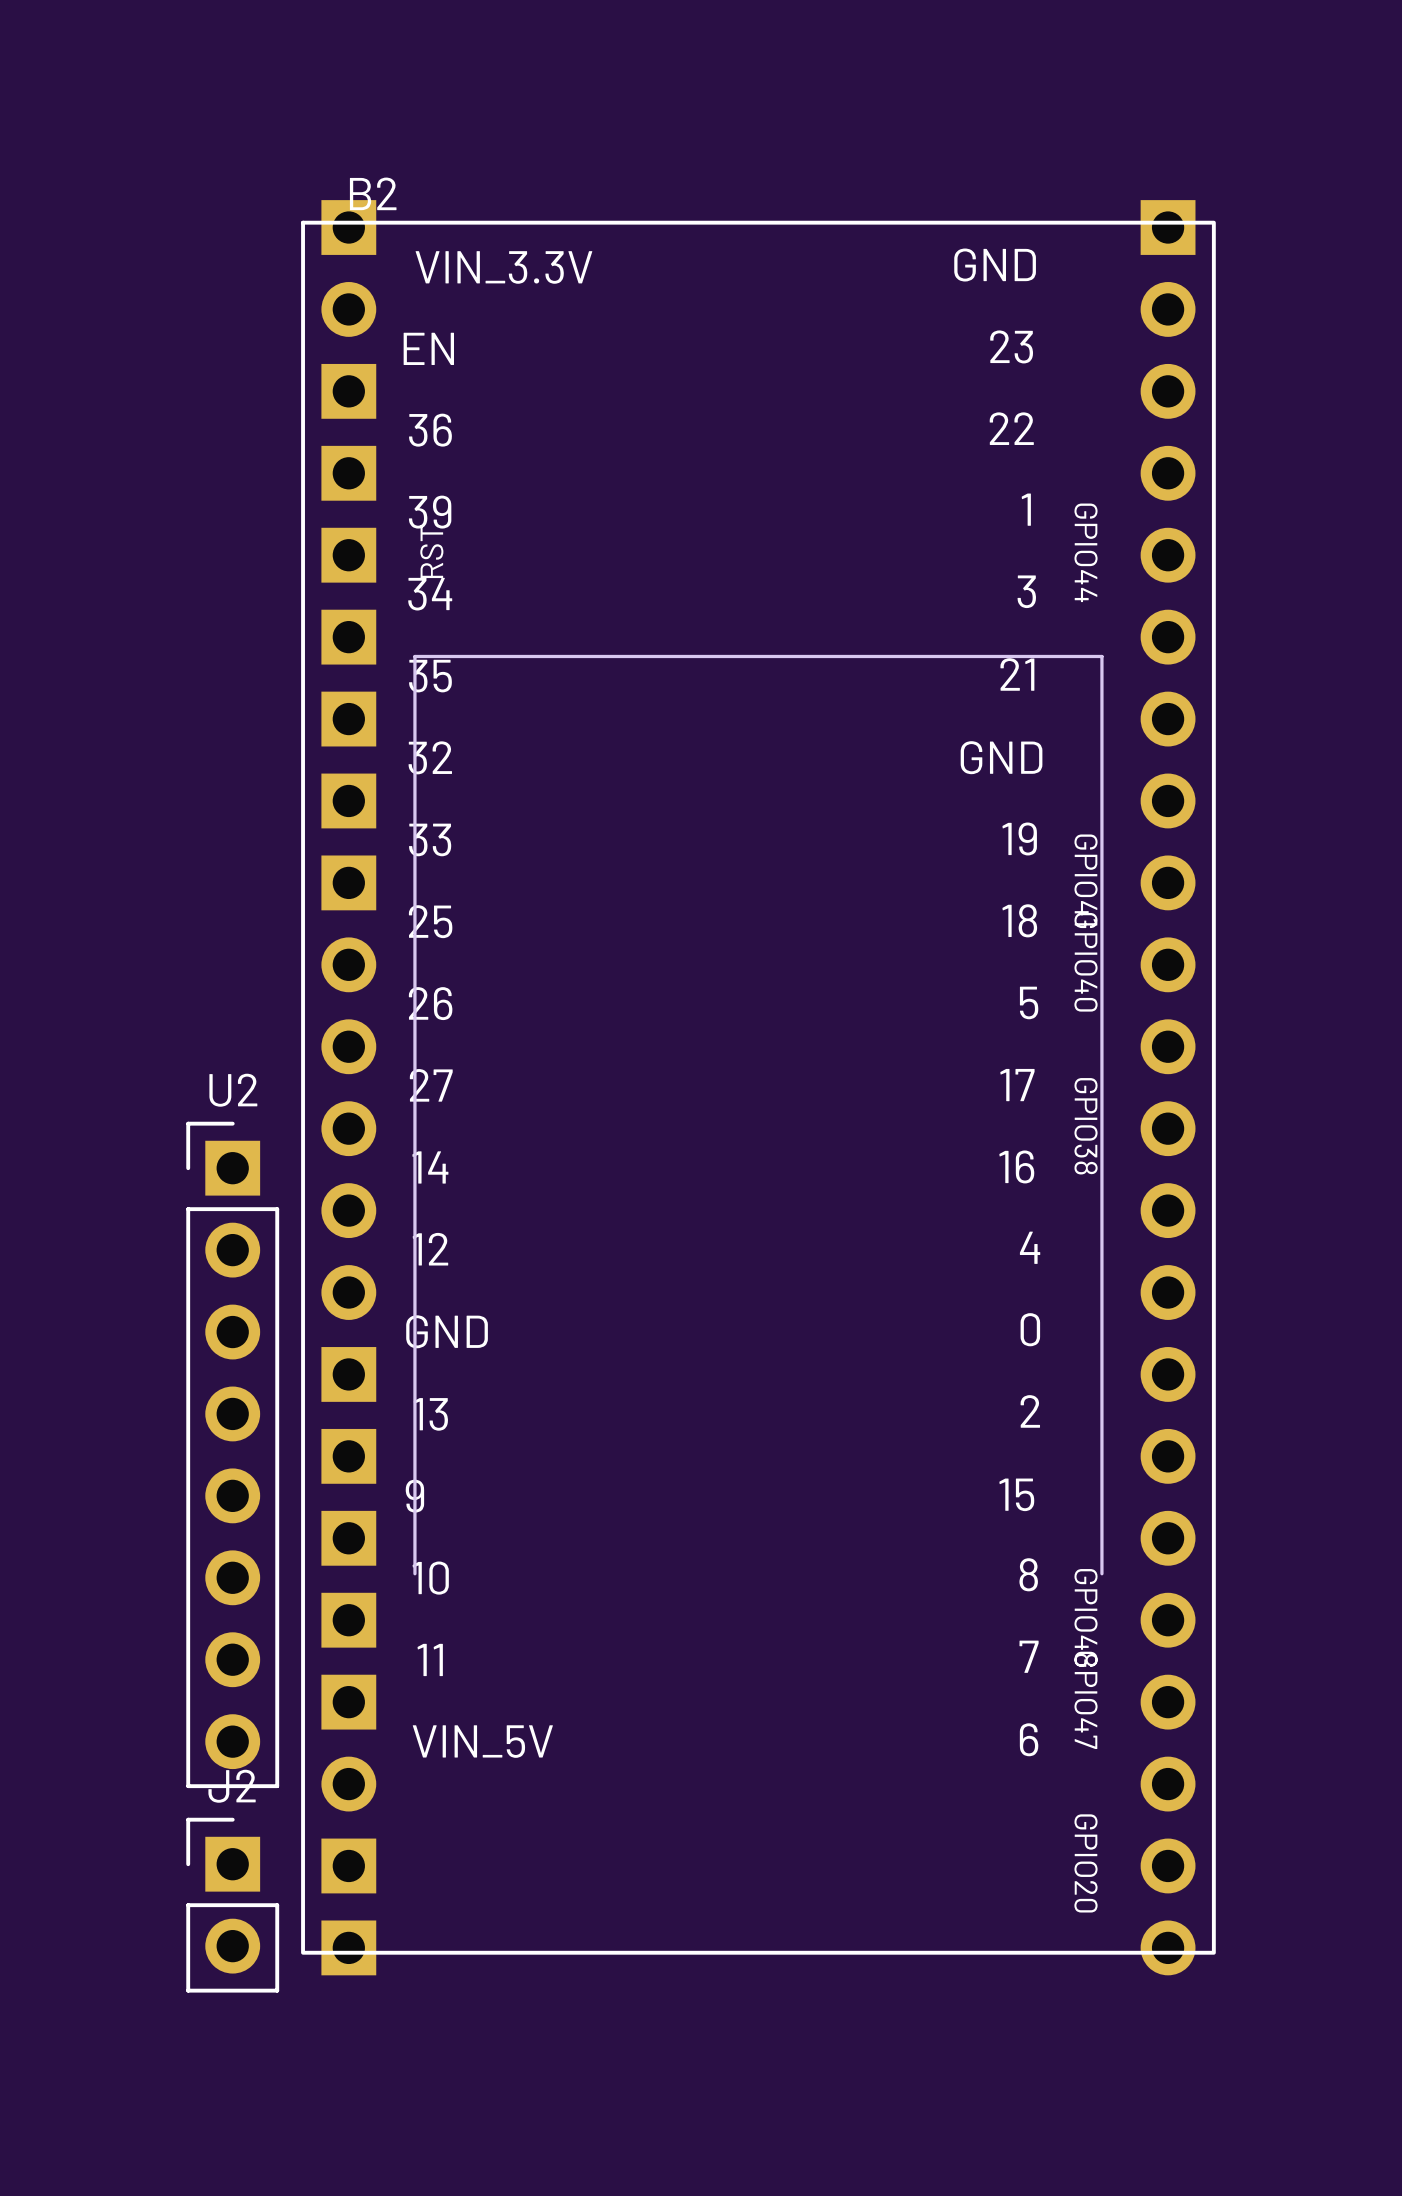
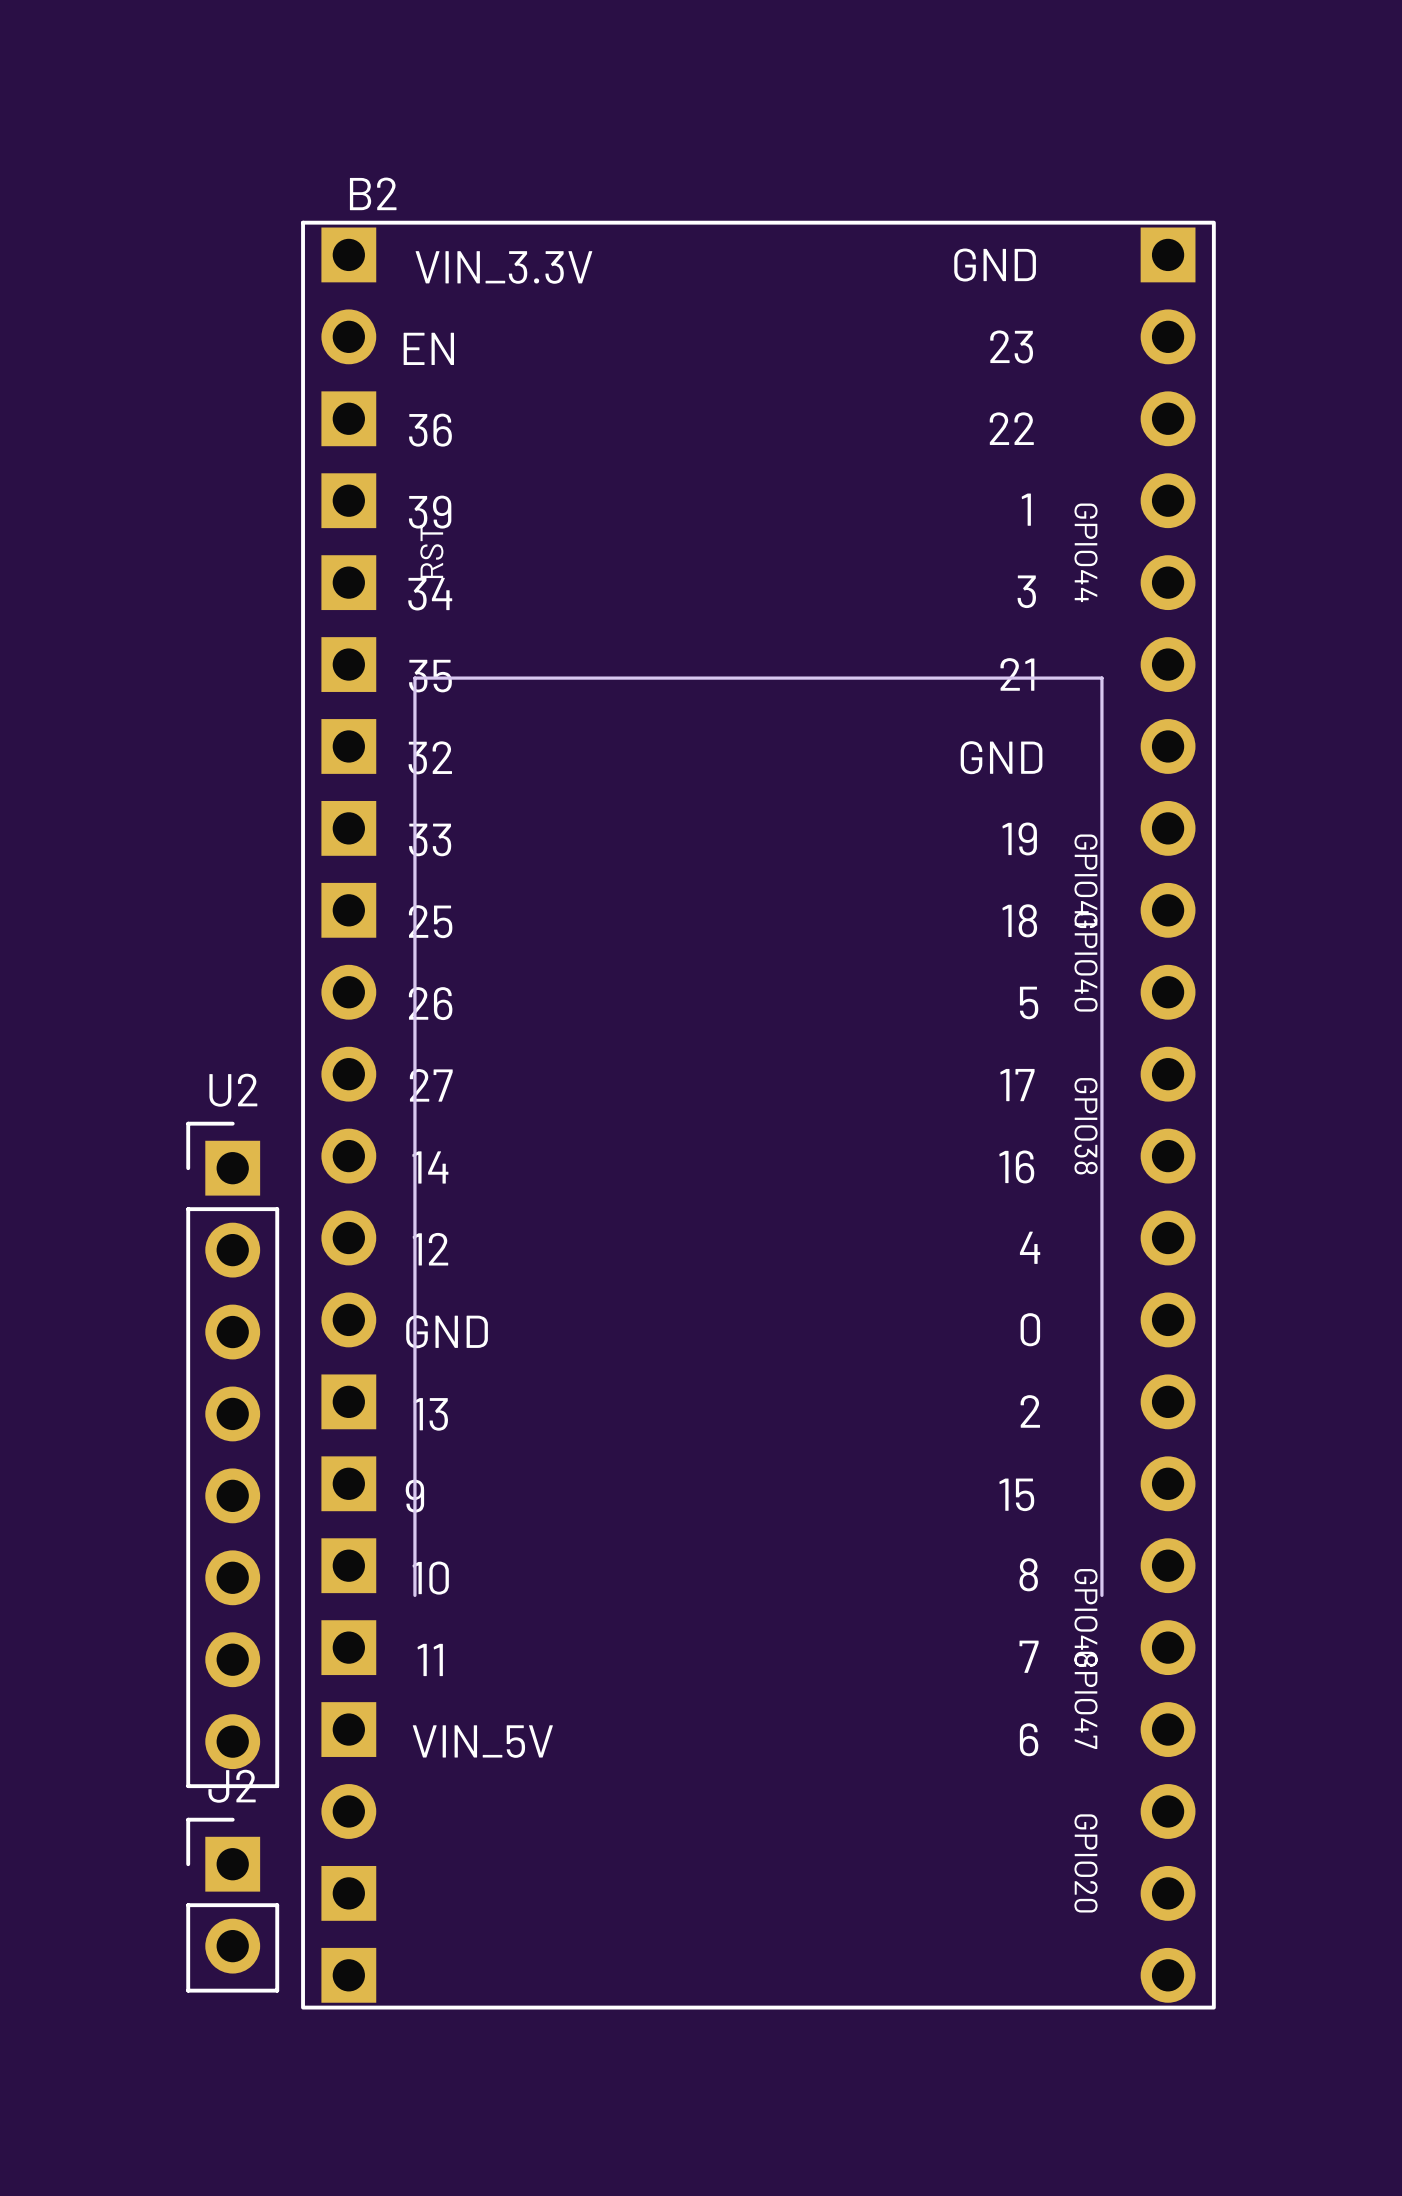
B2 footprint: [301, 200, 1216, 1976] -> [301, 220, 1216, 2010]
part position: (758, 1115) -> (758, 1136)

